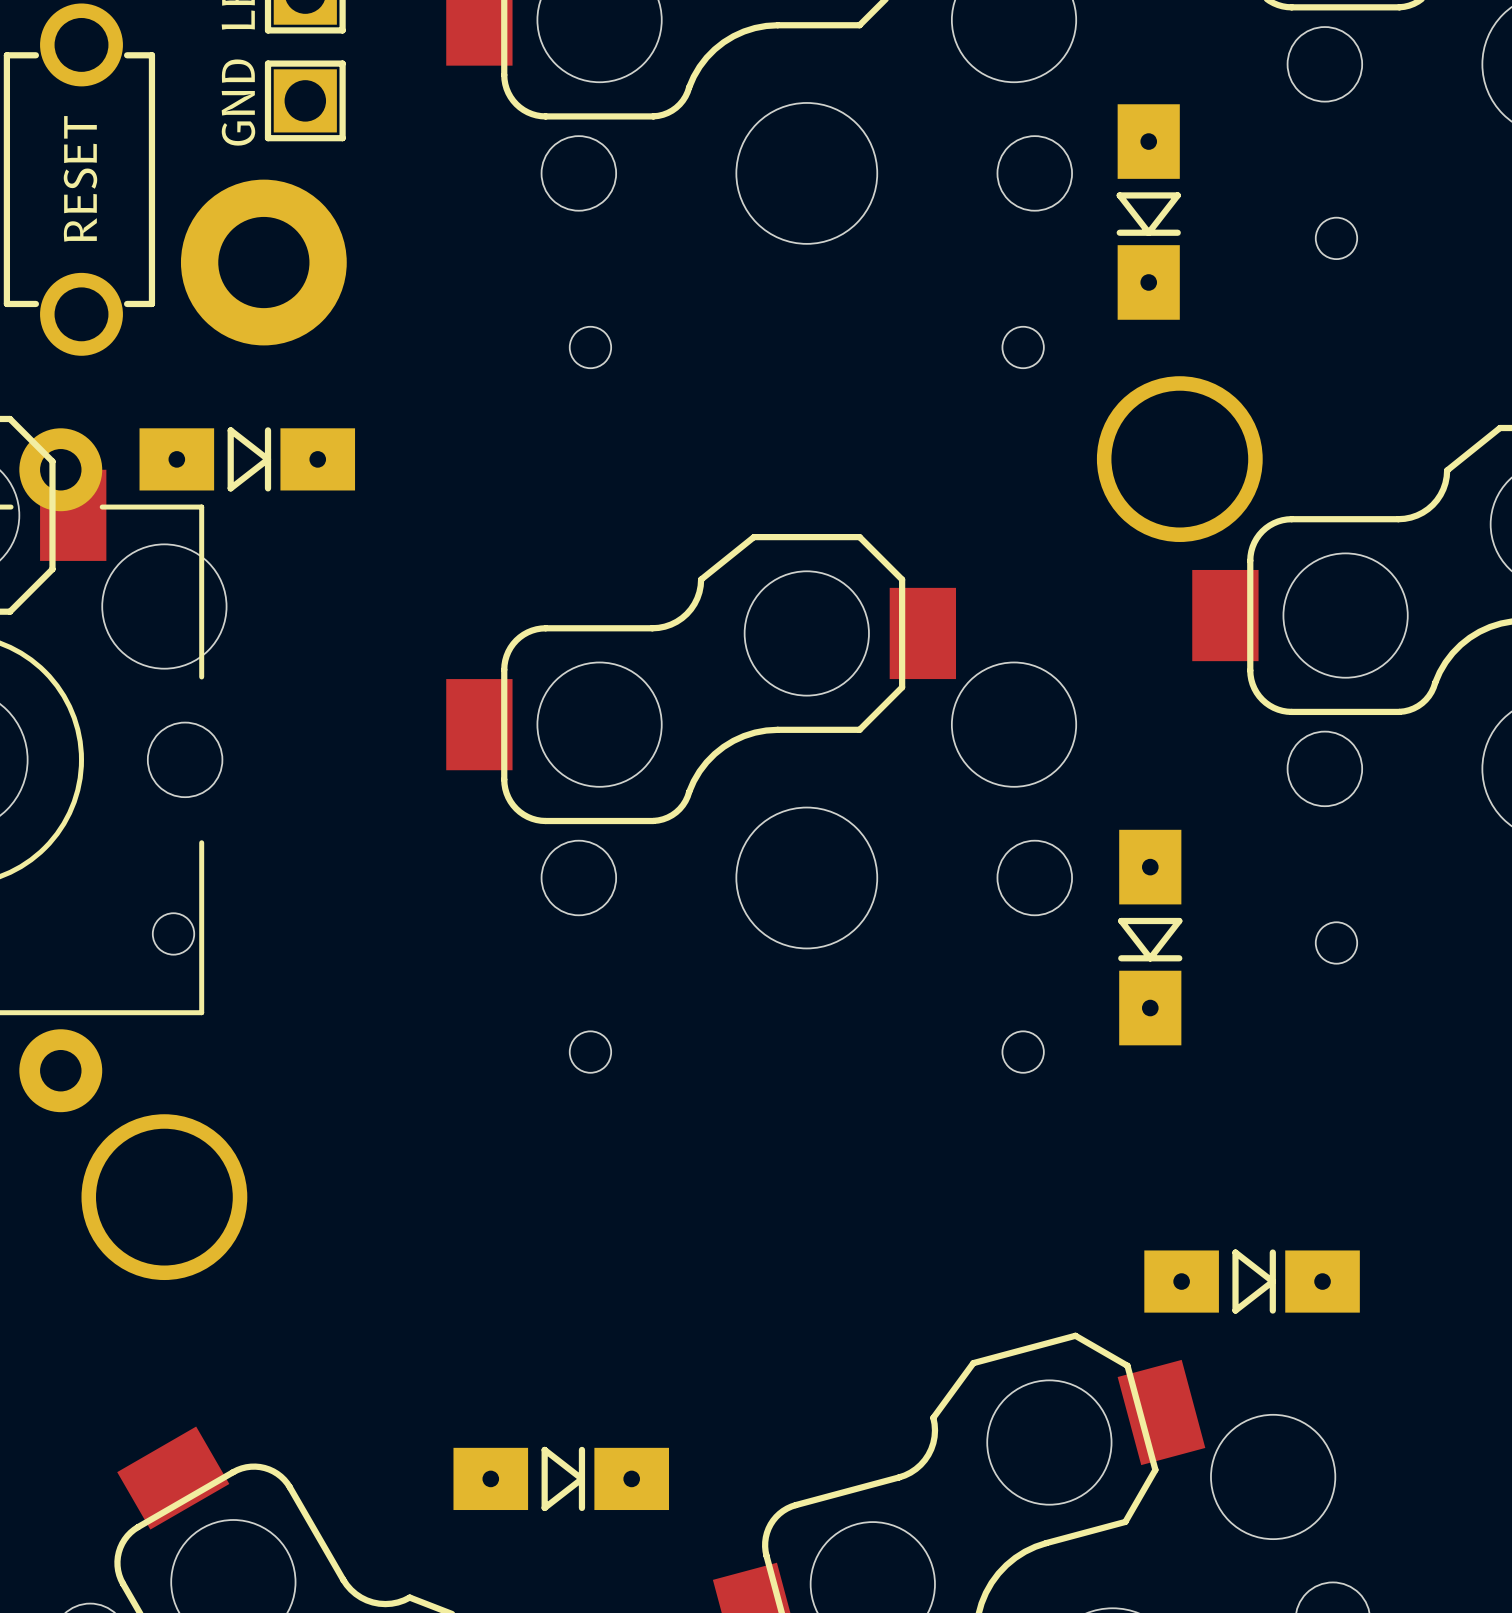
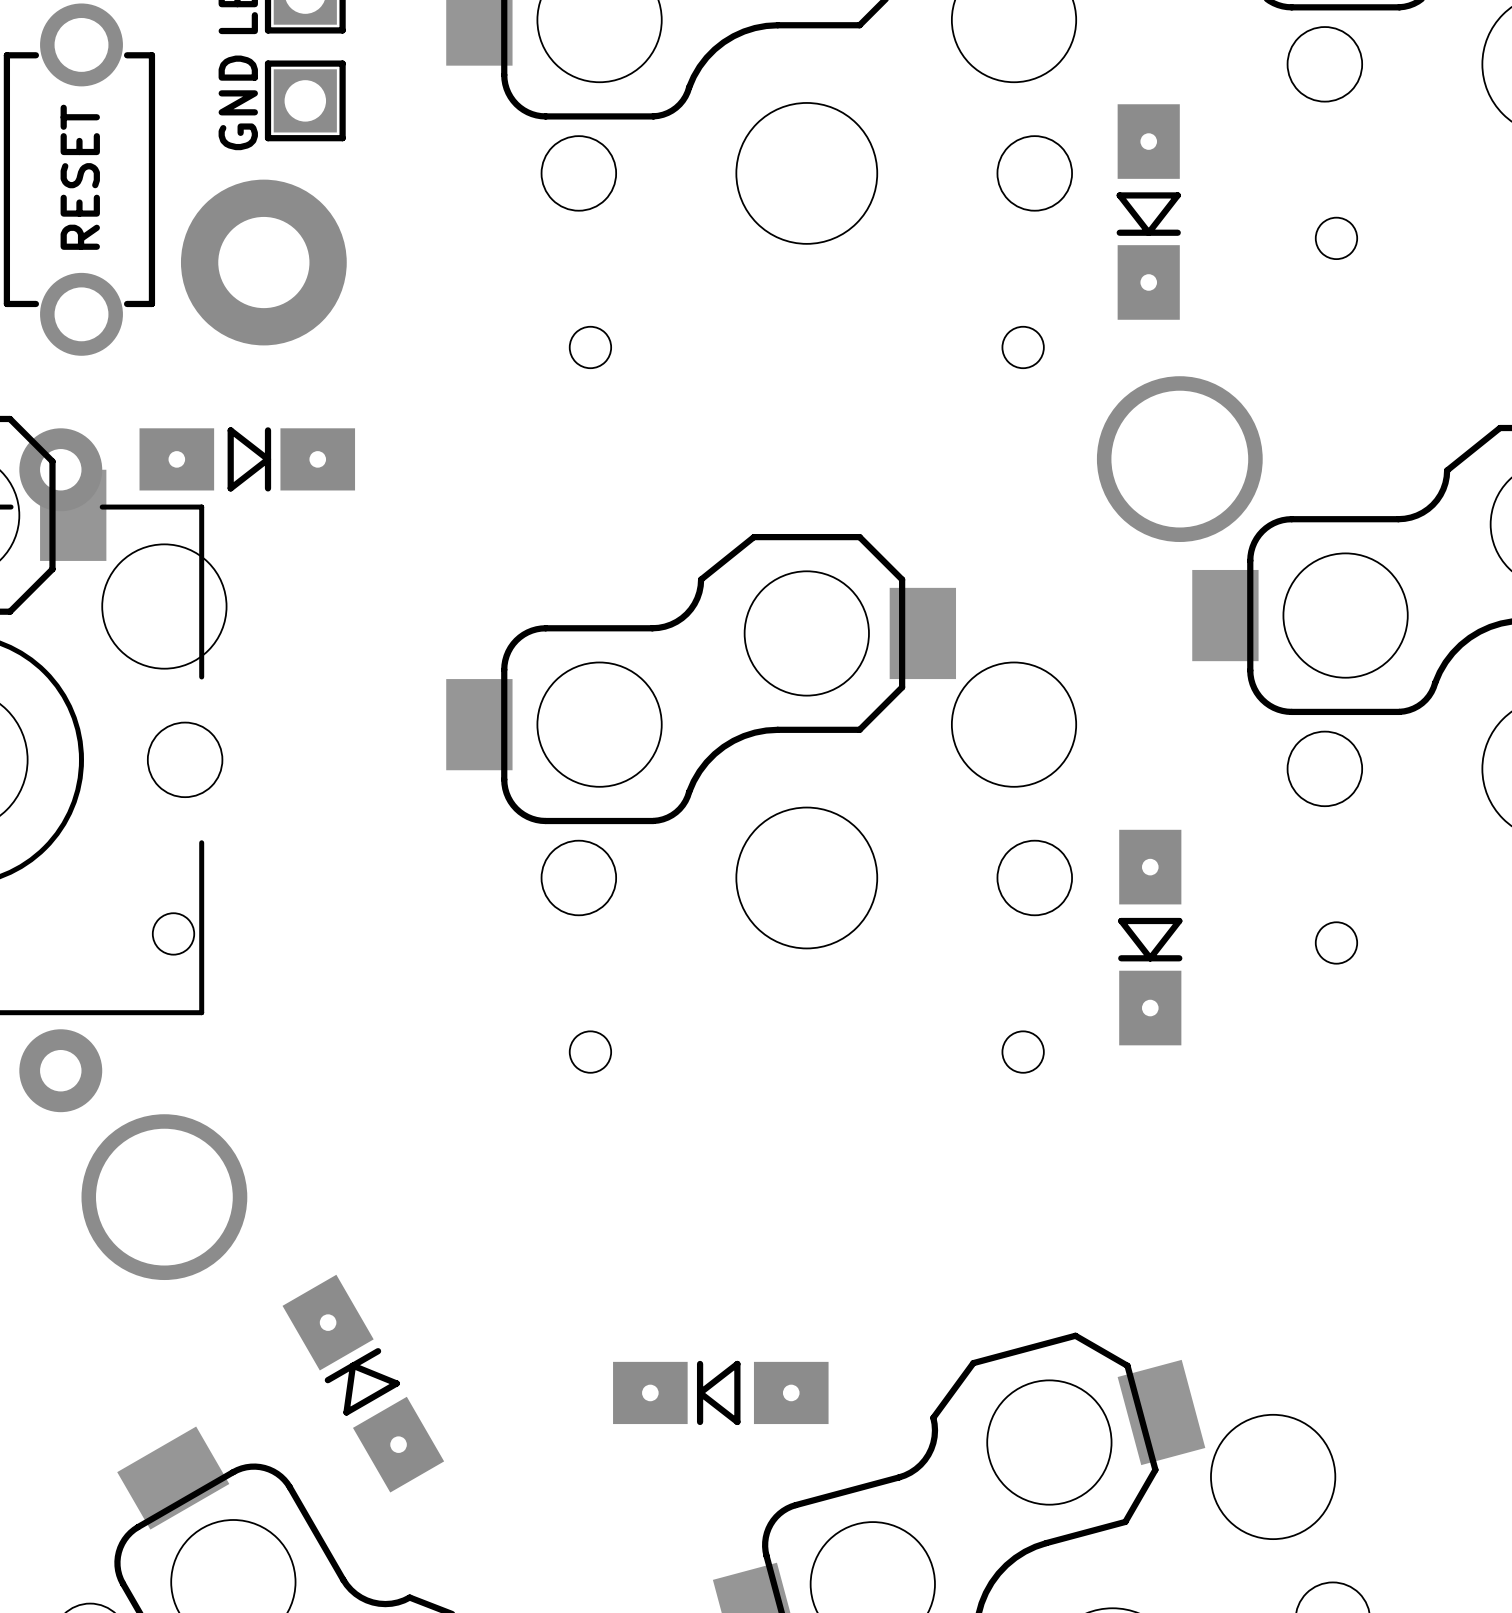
part: (1252, 1281) -> none
part: none -> (363, 1383)
part rotation: 0° (561, 1478) -> 180° (720, 1392)
part position: (561, 1478) -> (720, 1392)

